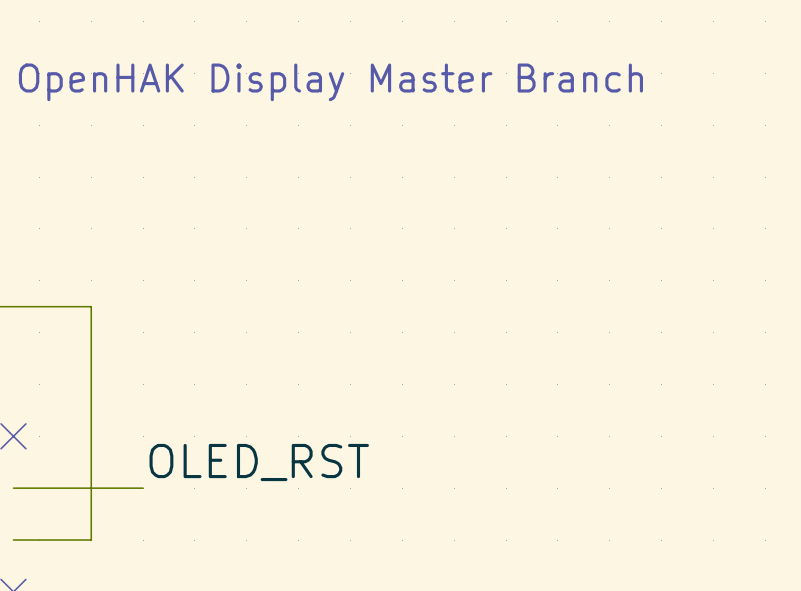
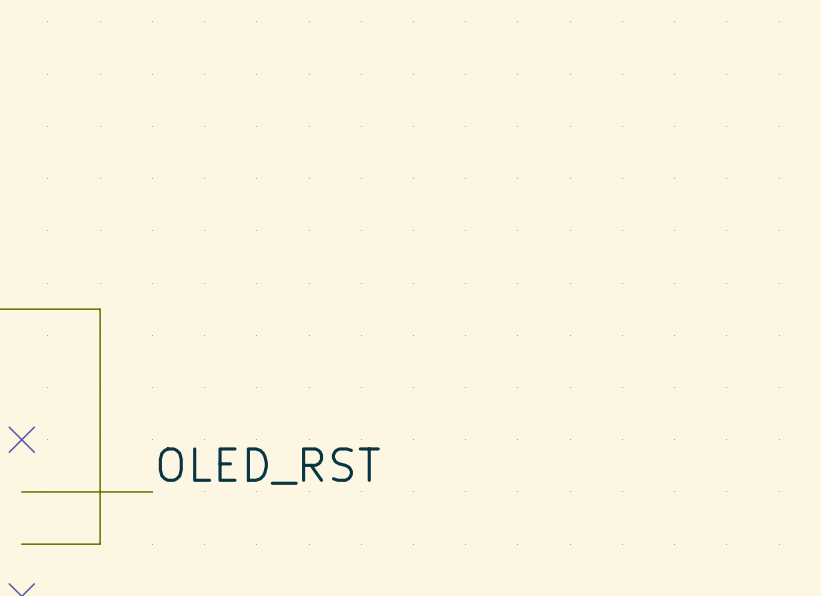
text: OpenHAK Display Master Branch (330, 82) -> none

